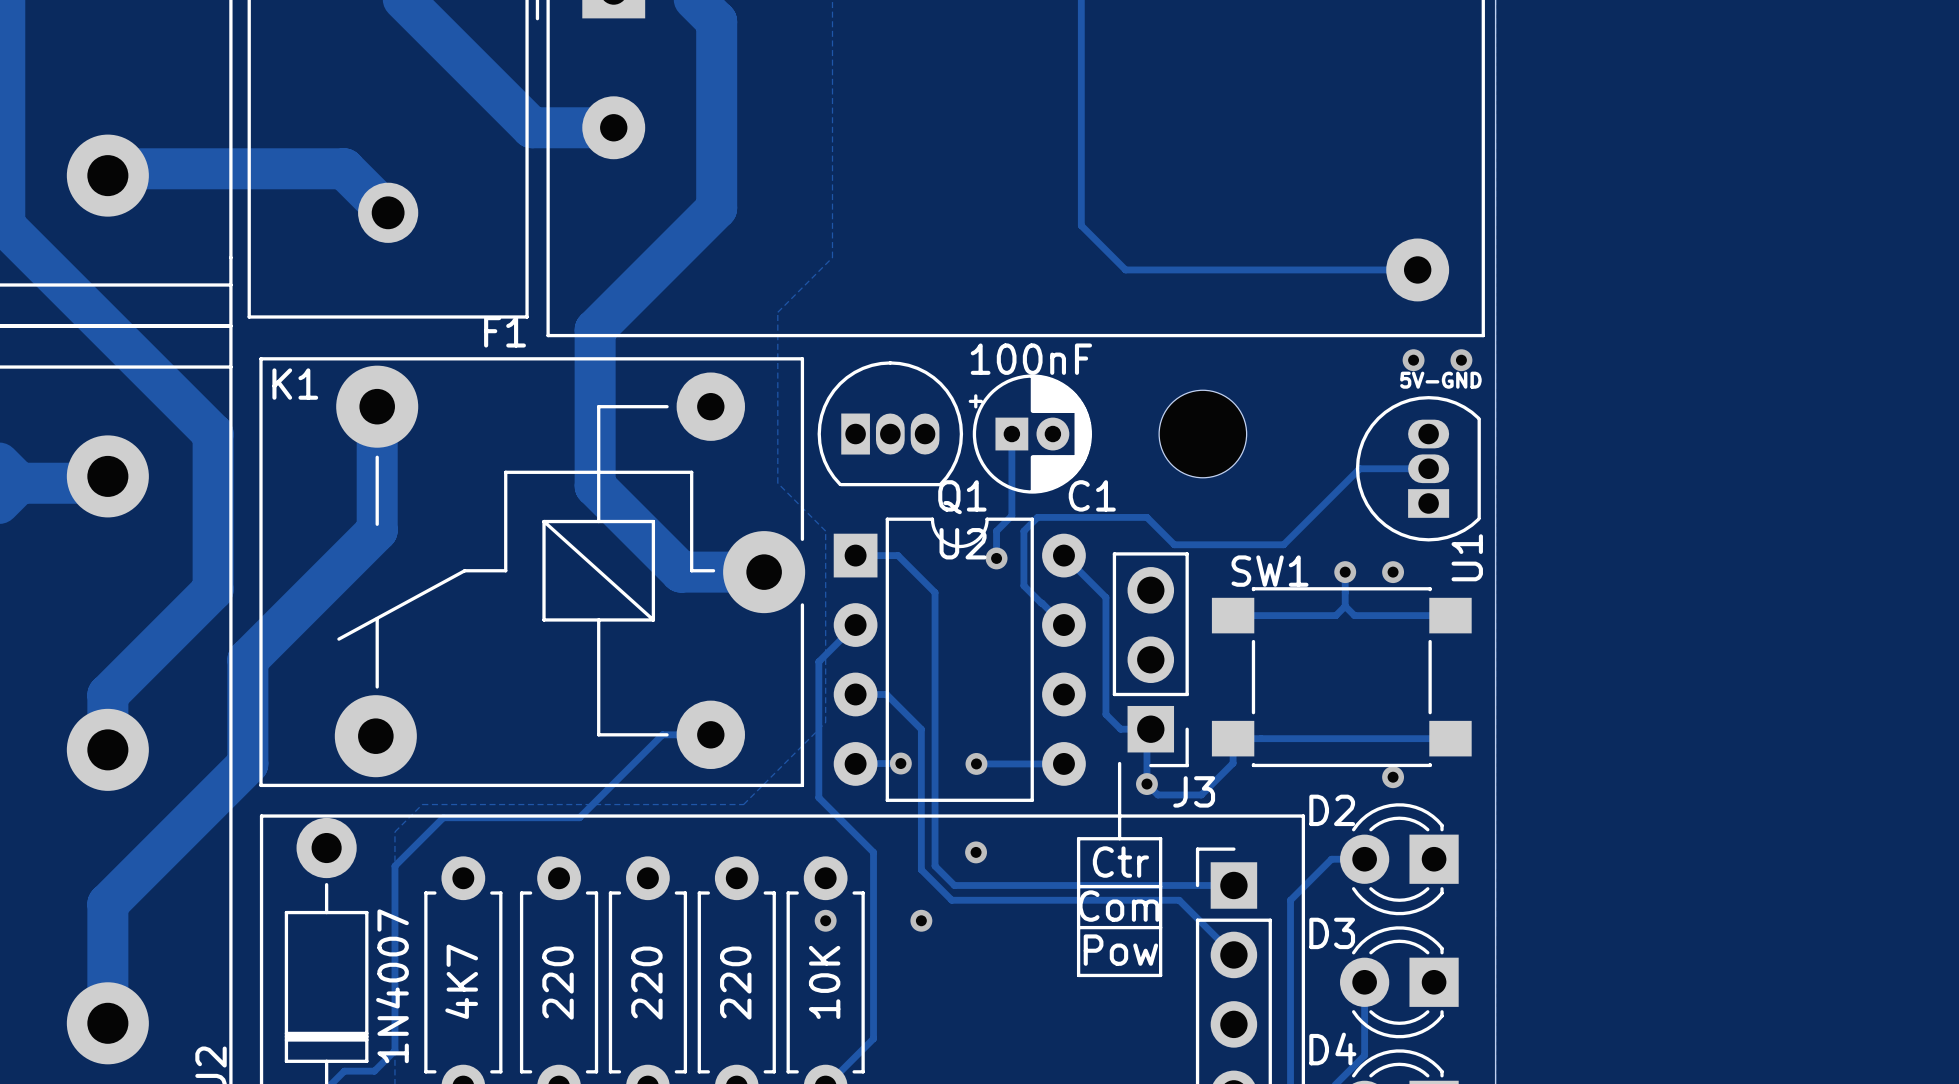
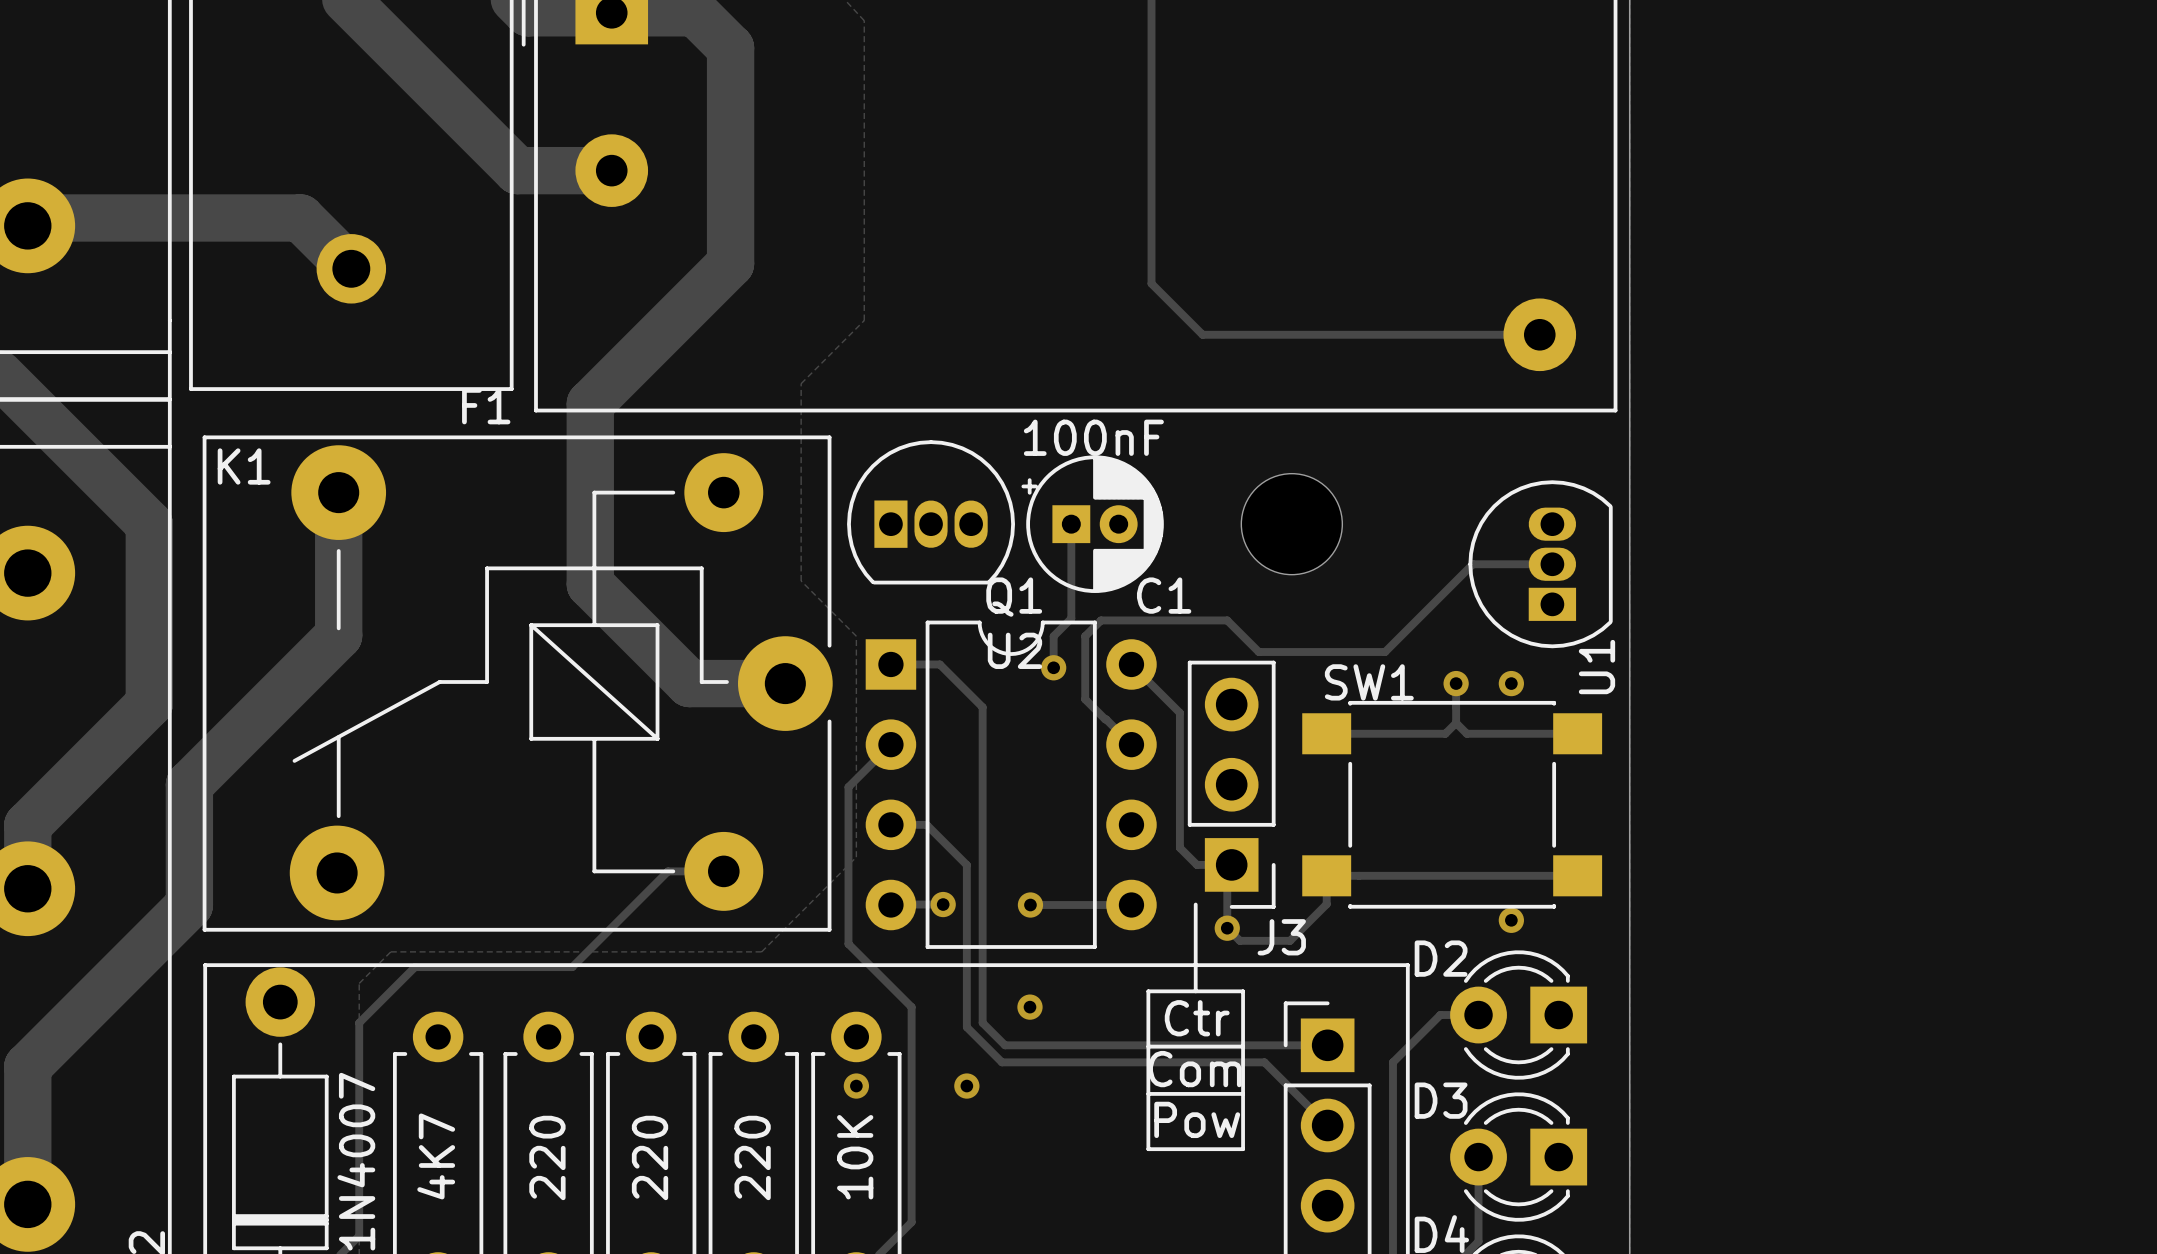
via: (1413, 360) -> none
via: (1461, 360) -> none
text: 5V-GND (1440, 380) -> none

